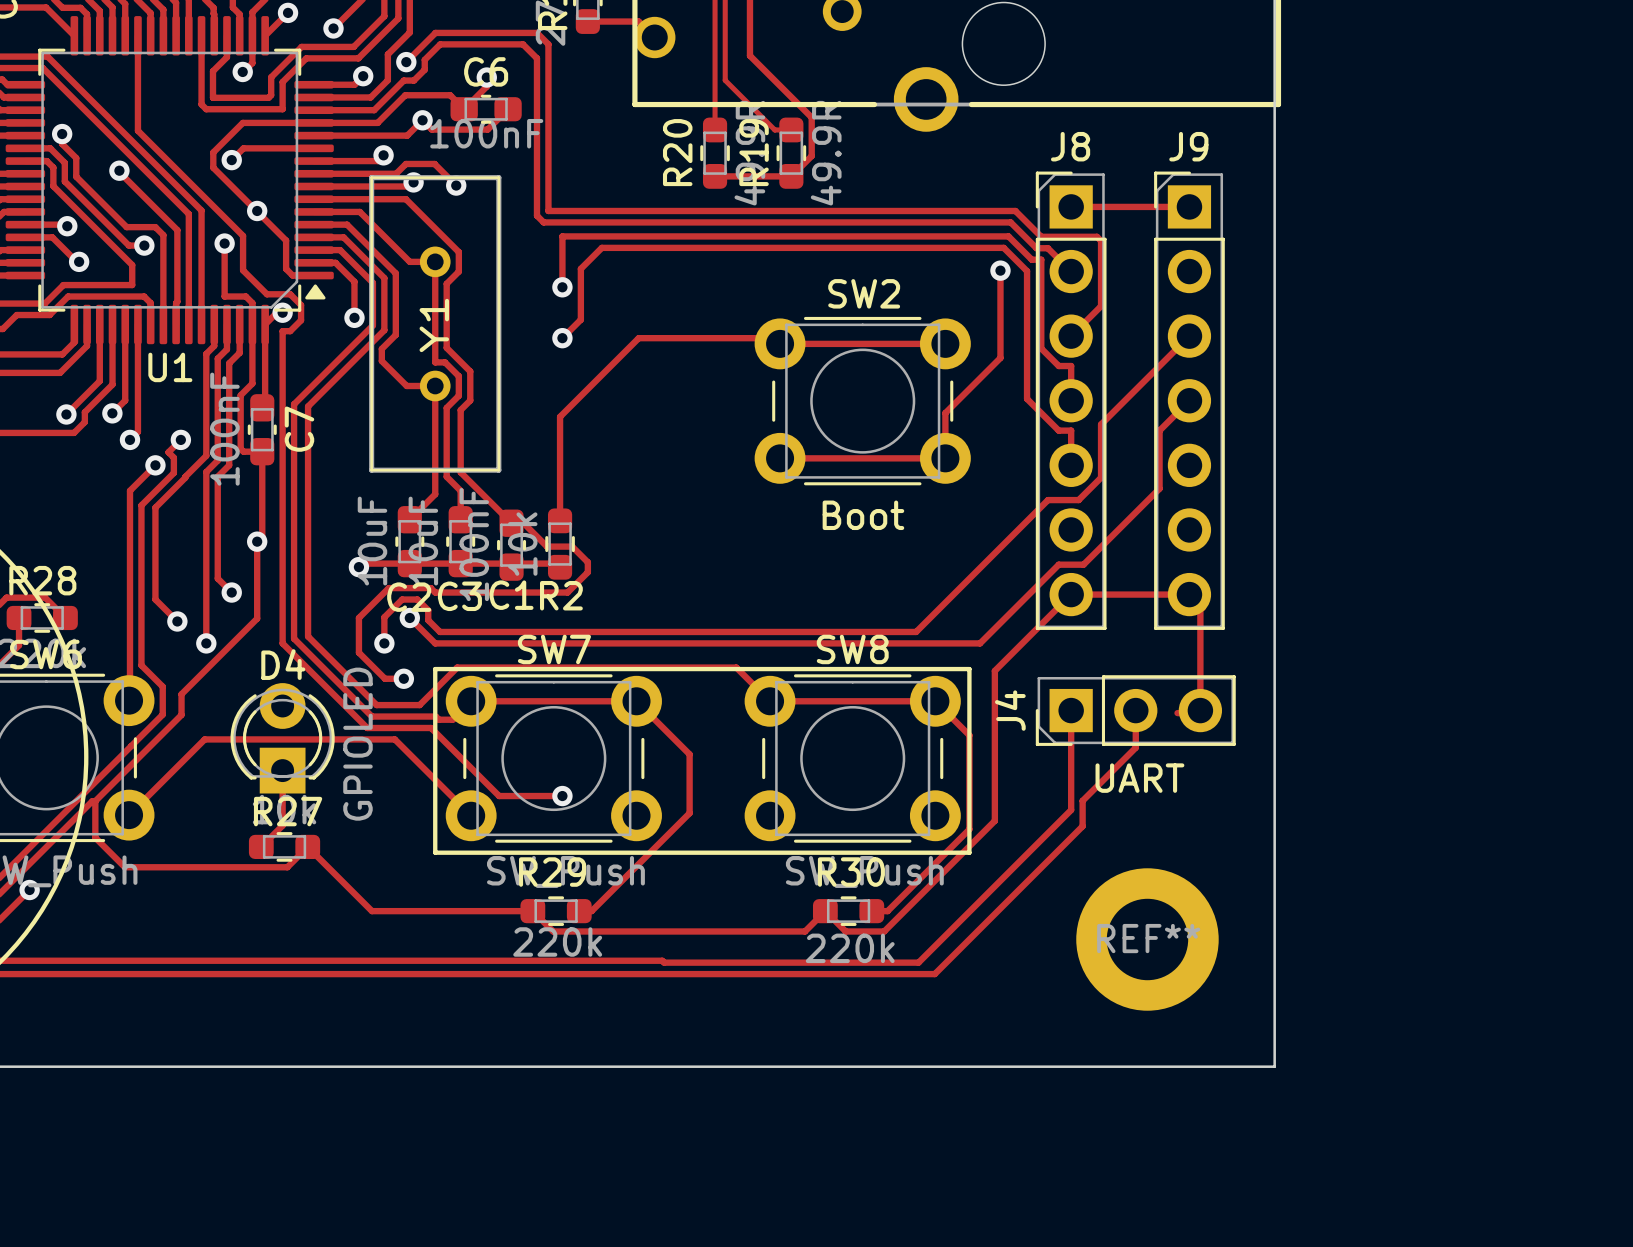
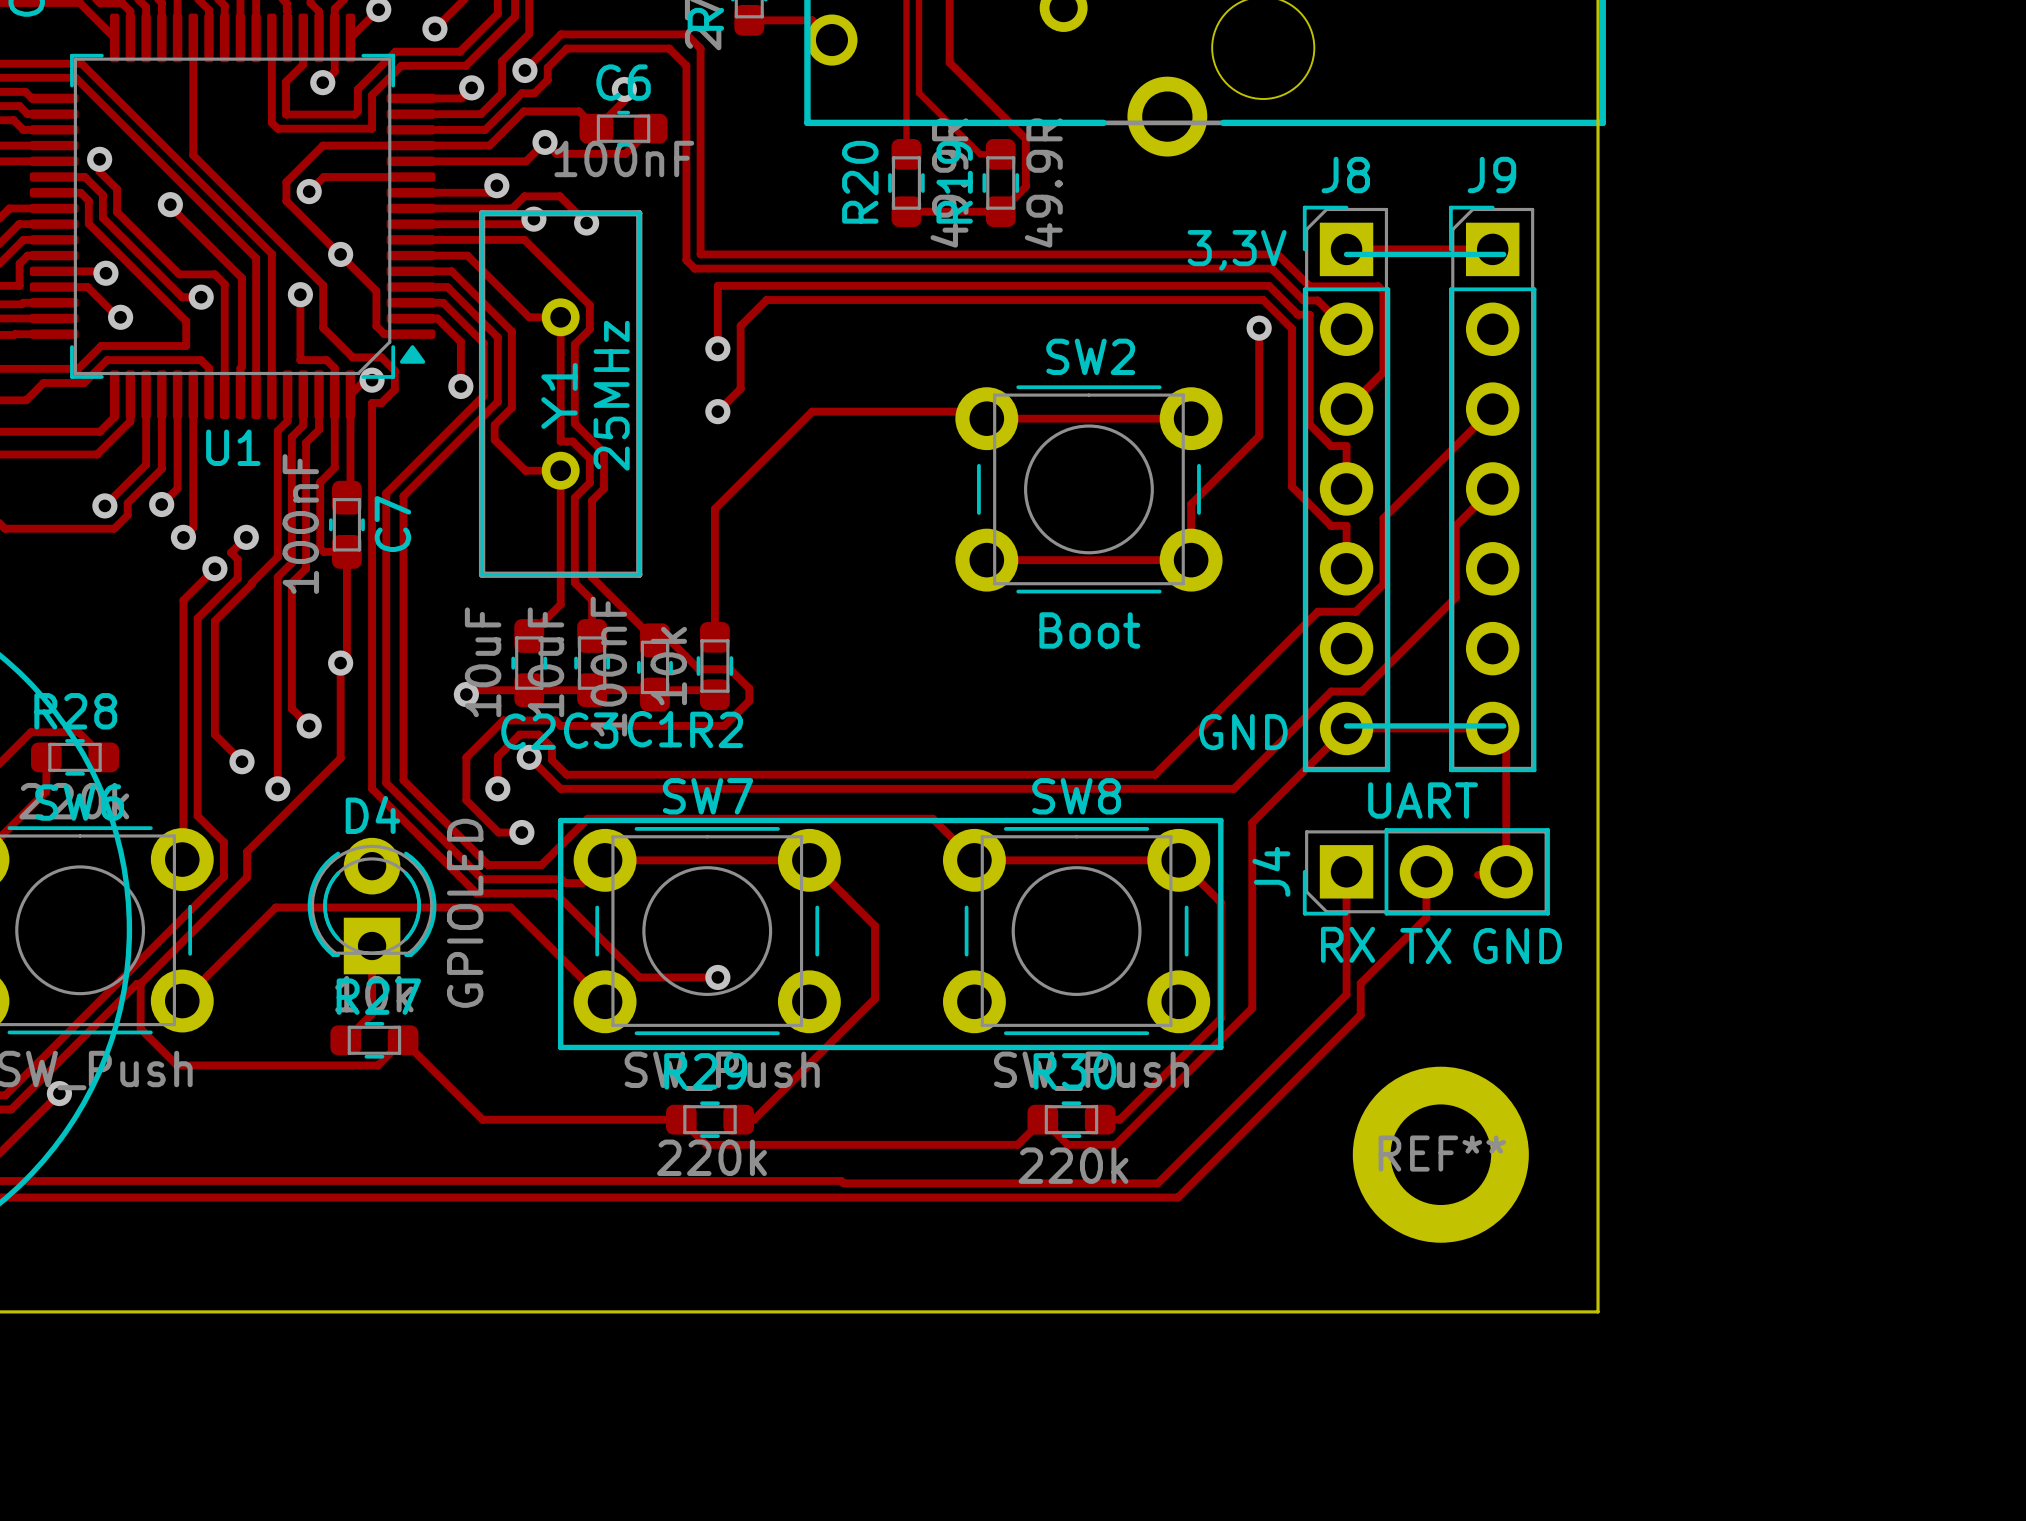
J8 text: none -> 3,3V (1237, 250)
line: none -> (1346, 254) (1503, 254)
Y1 text: none -> 25MHz (611, 395)
line: none -> (1346, 725) (1503, 725)
J8 text: none -> GND (1243, 732)
J4 text: none -> RX (1348, 944)
J4 text: none -> TX (1425, 946)
J4 text: none -> GND (1517, 946)
J4 value position: UART (1139, 778) -> UART (1423, 800)

